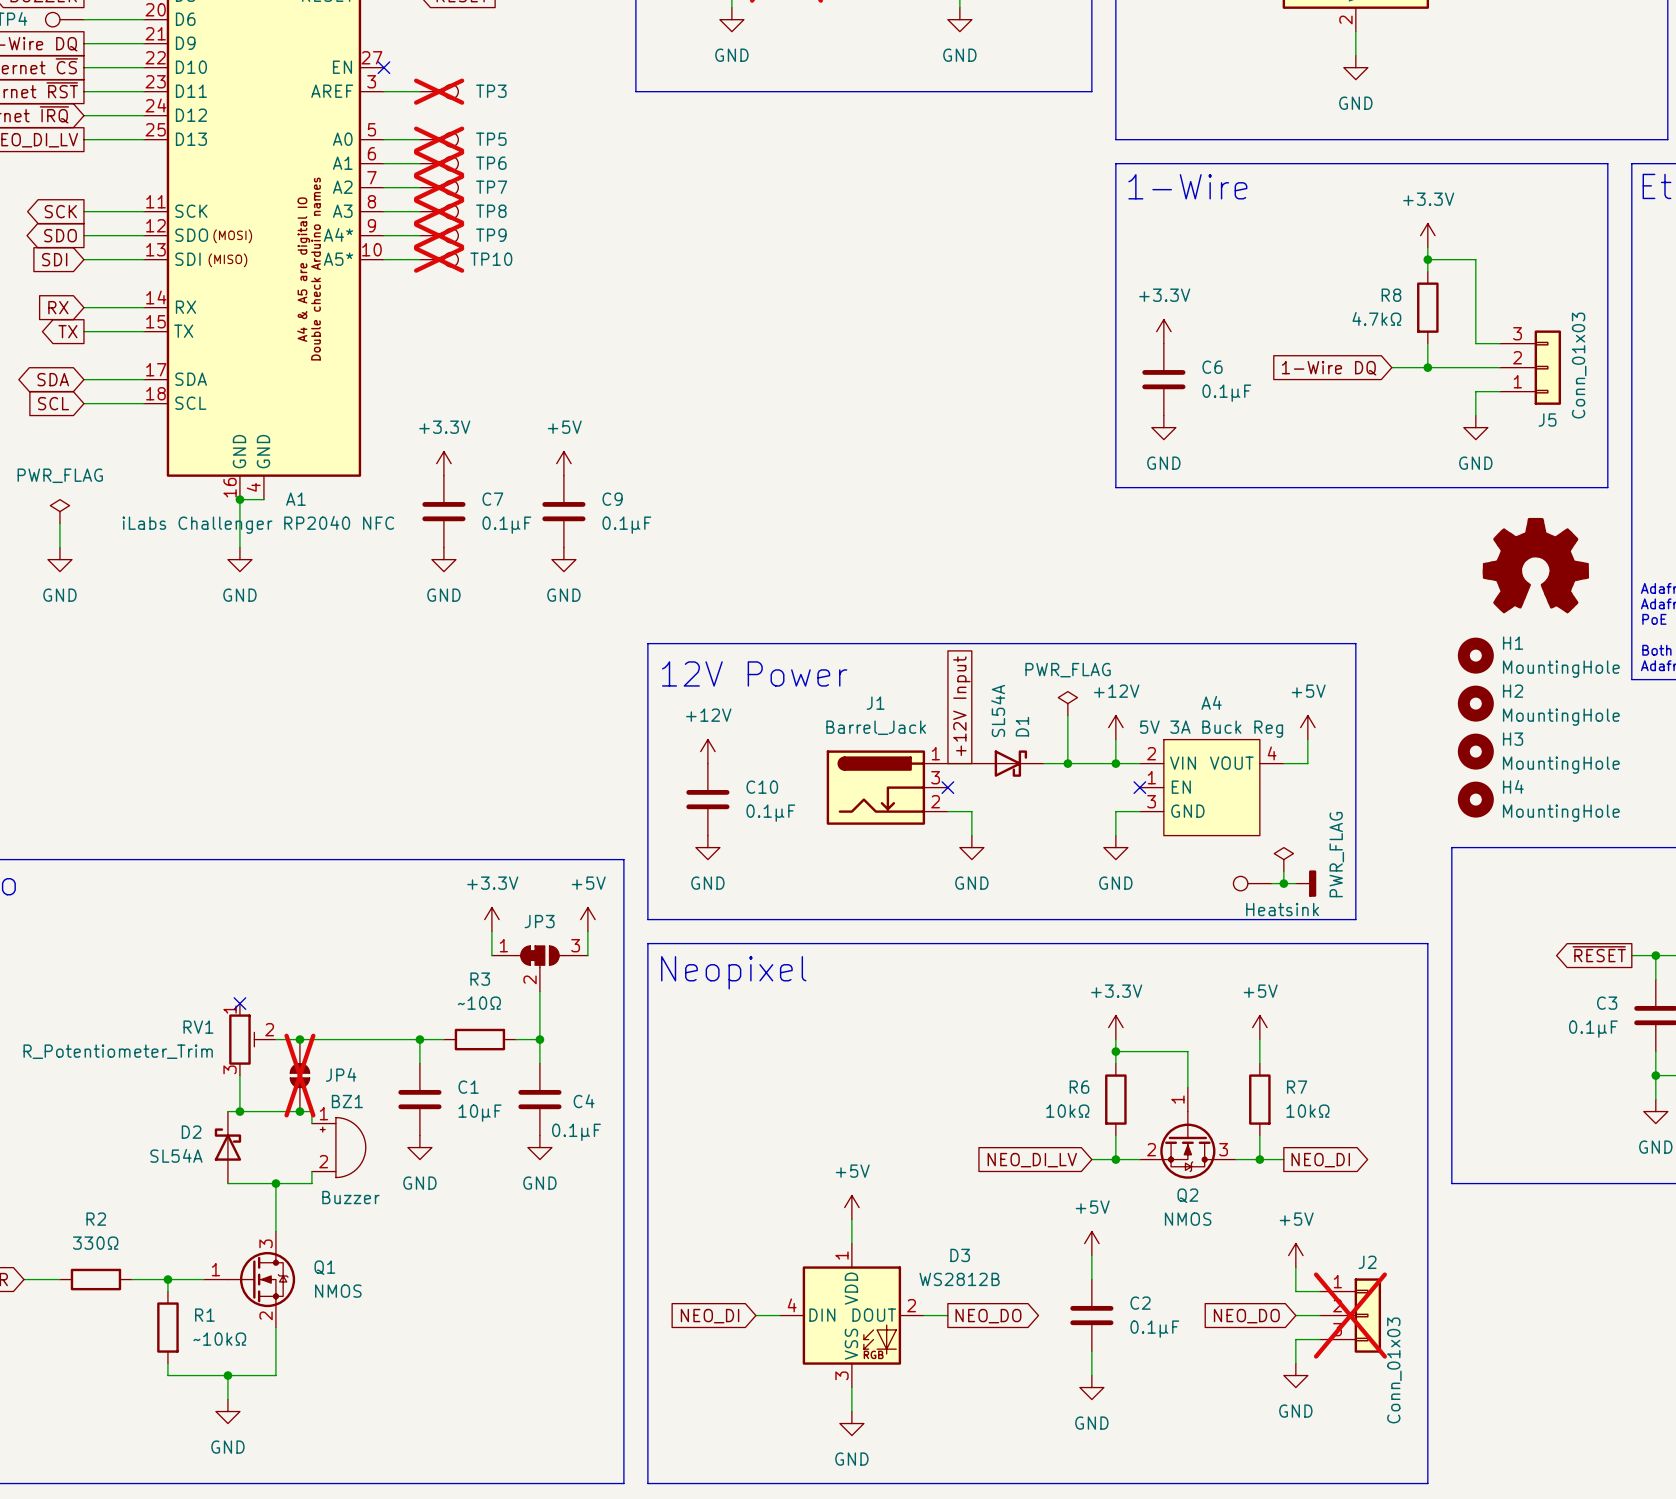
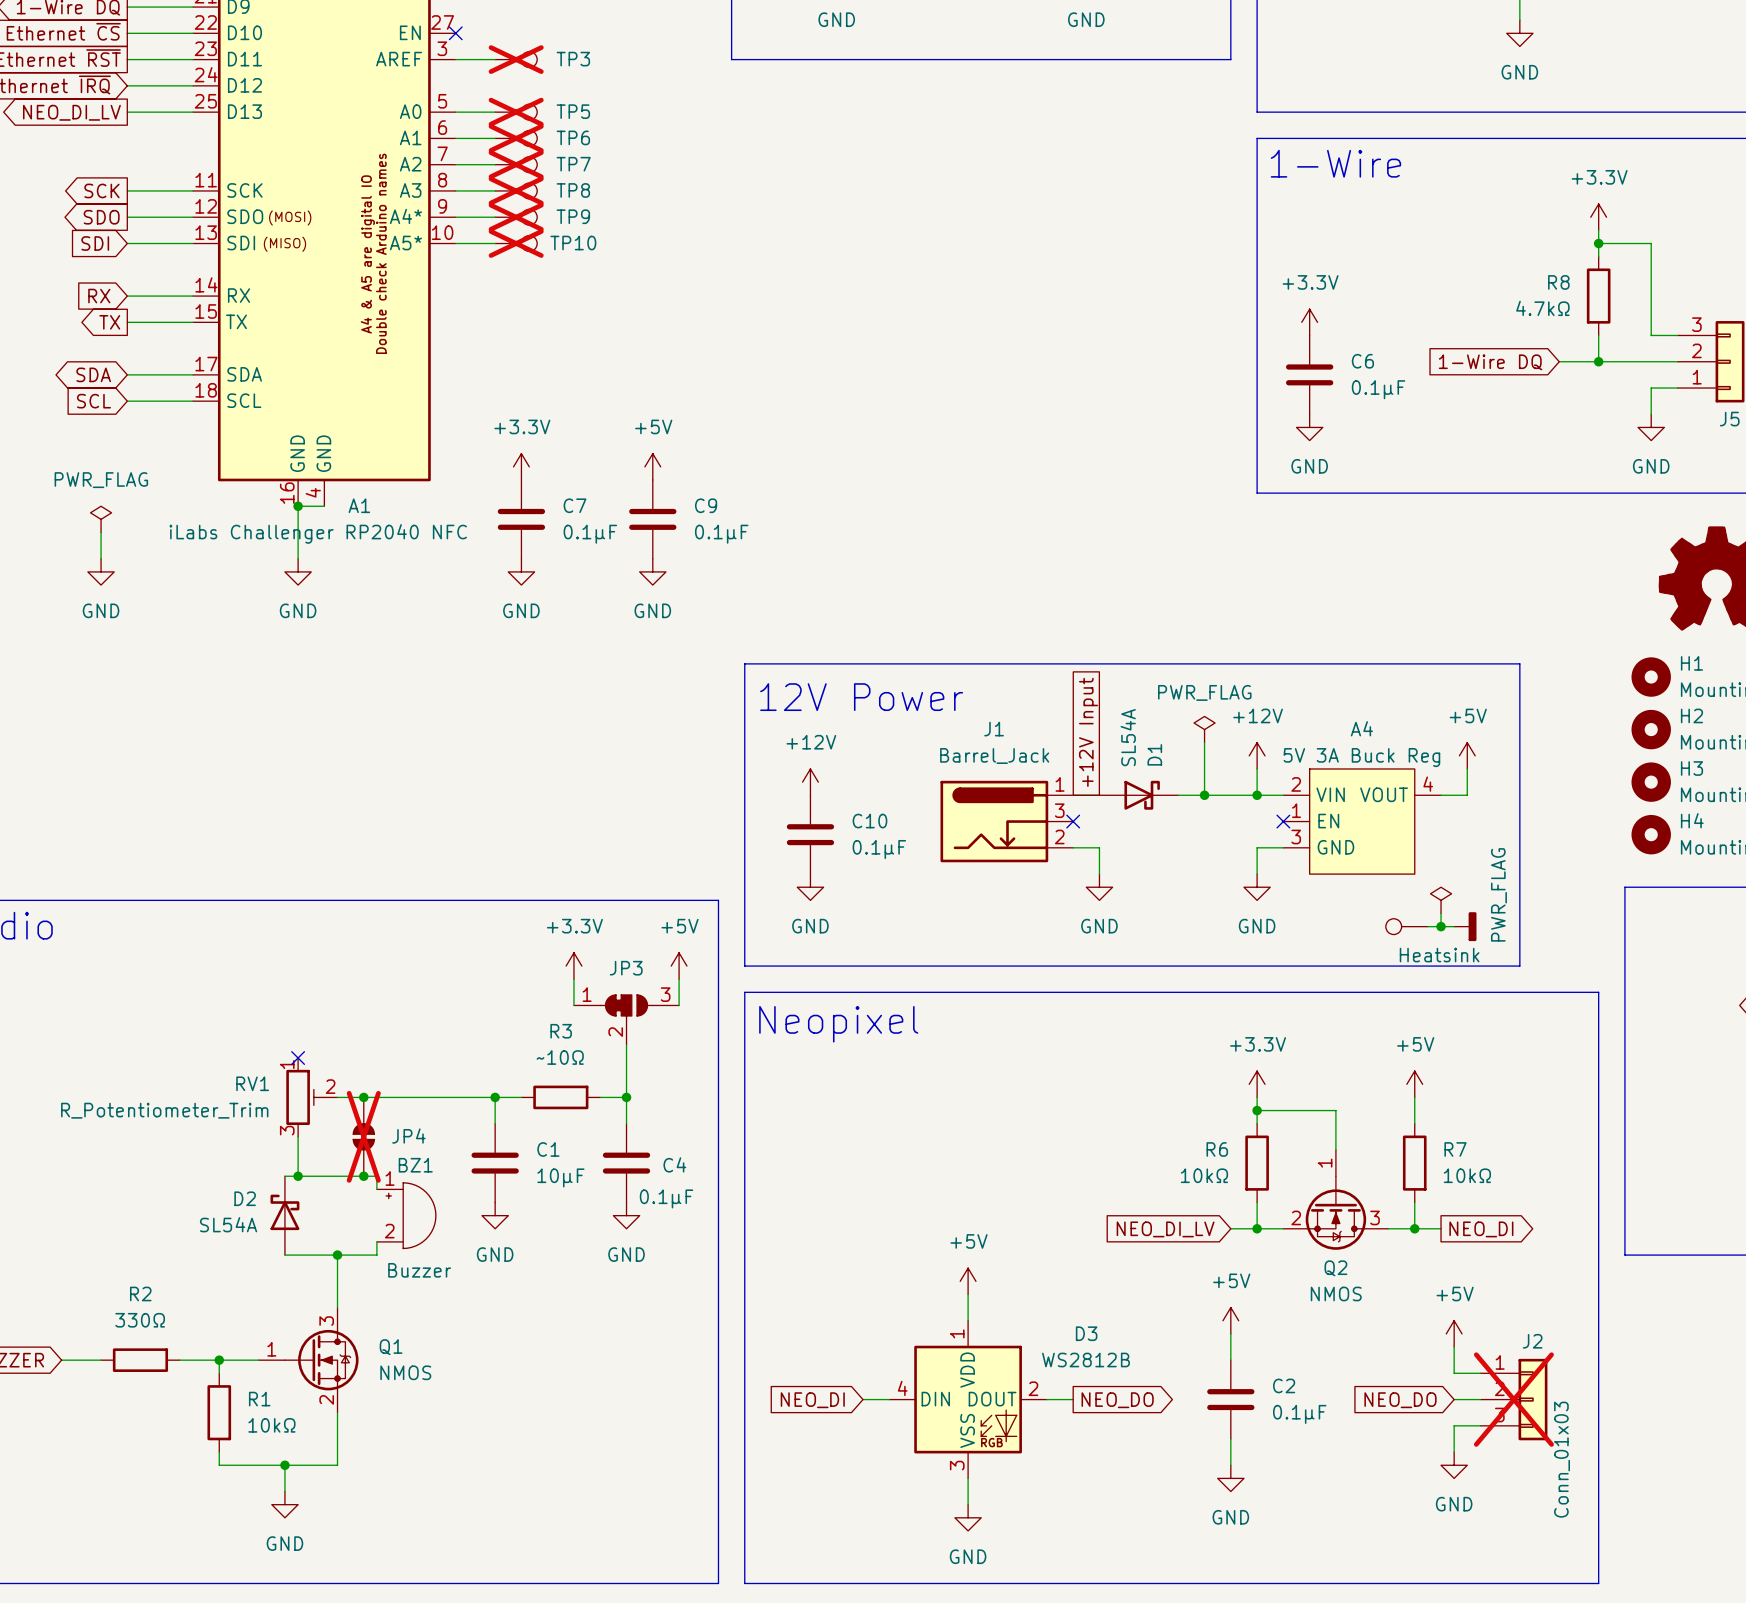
R1 value: ~10kΩ (219, 1339) -> 10kΩ (271, 1425)

